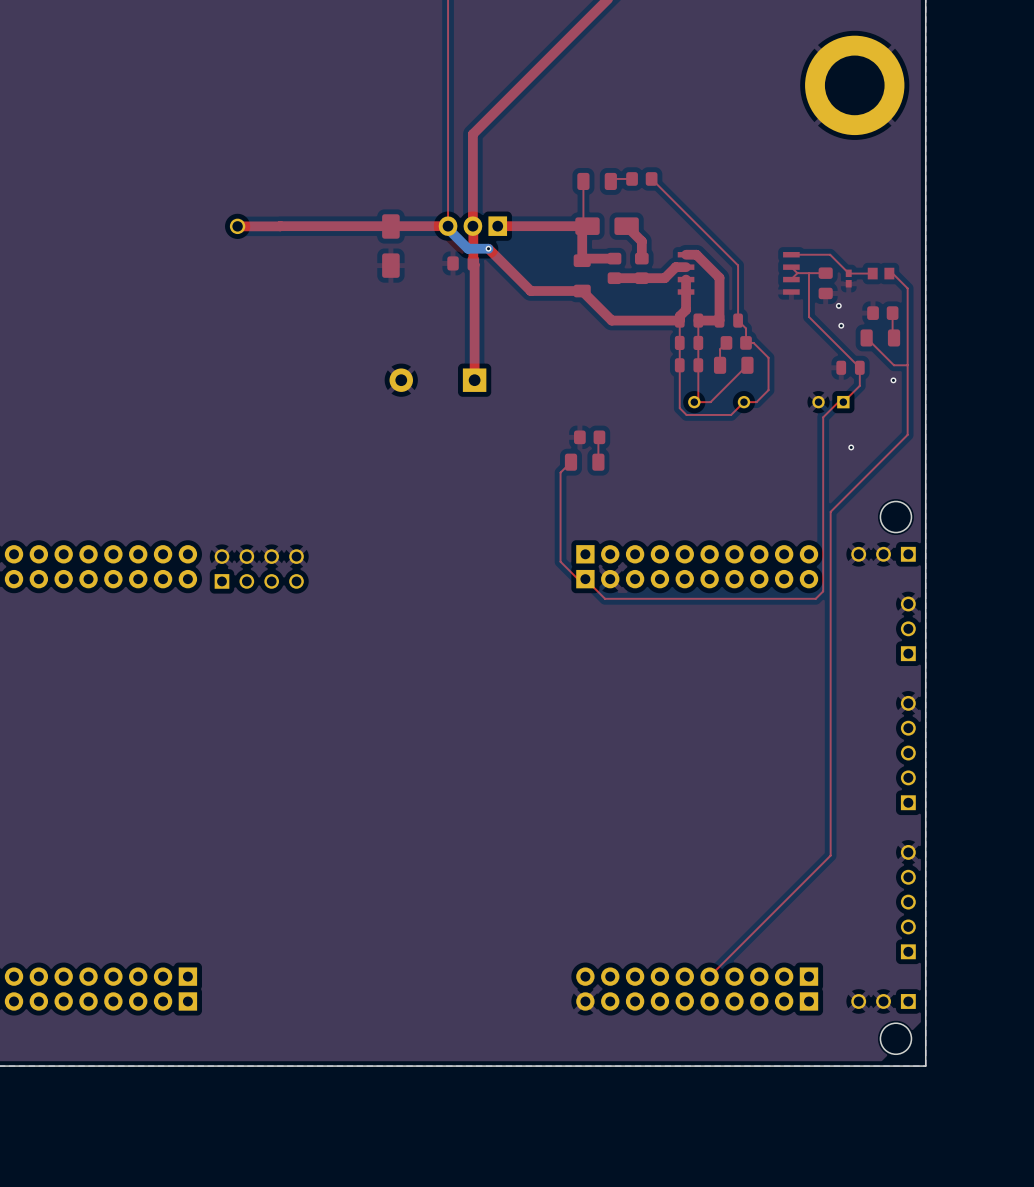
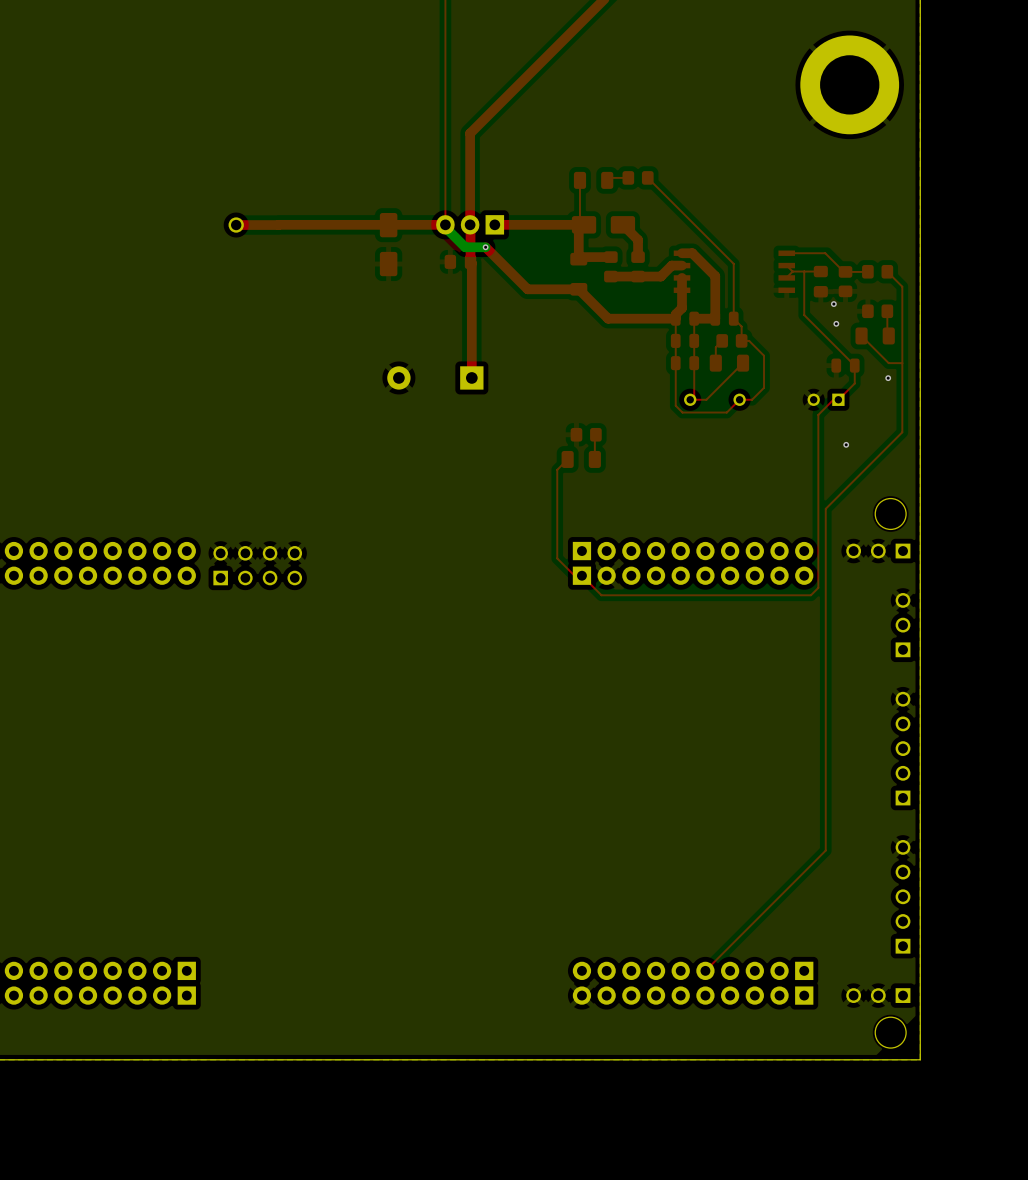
part footprint: [867, 267, 895, 280] -> [862, 264, 894, 279]
part footprint: [845, 269, 852, 288] -> [838, 266, 853, 298]

